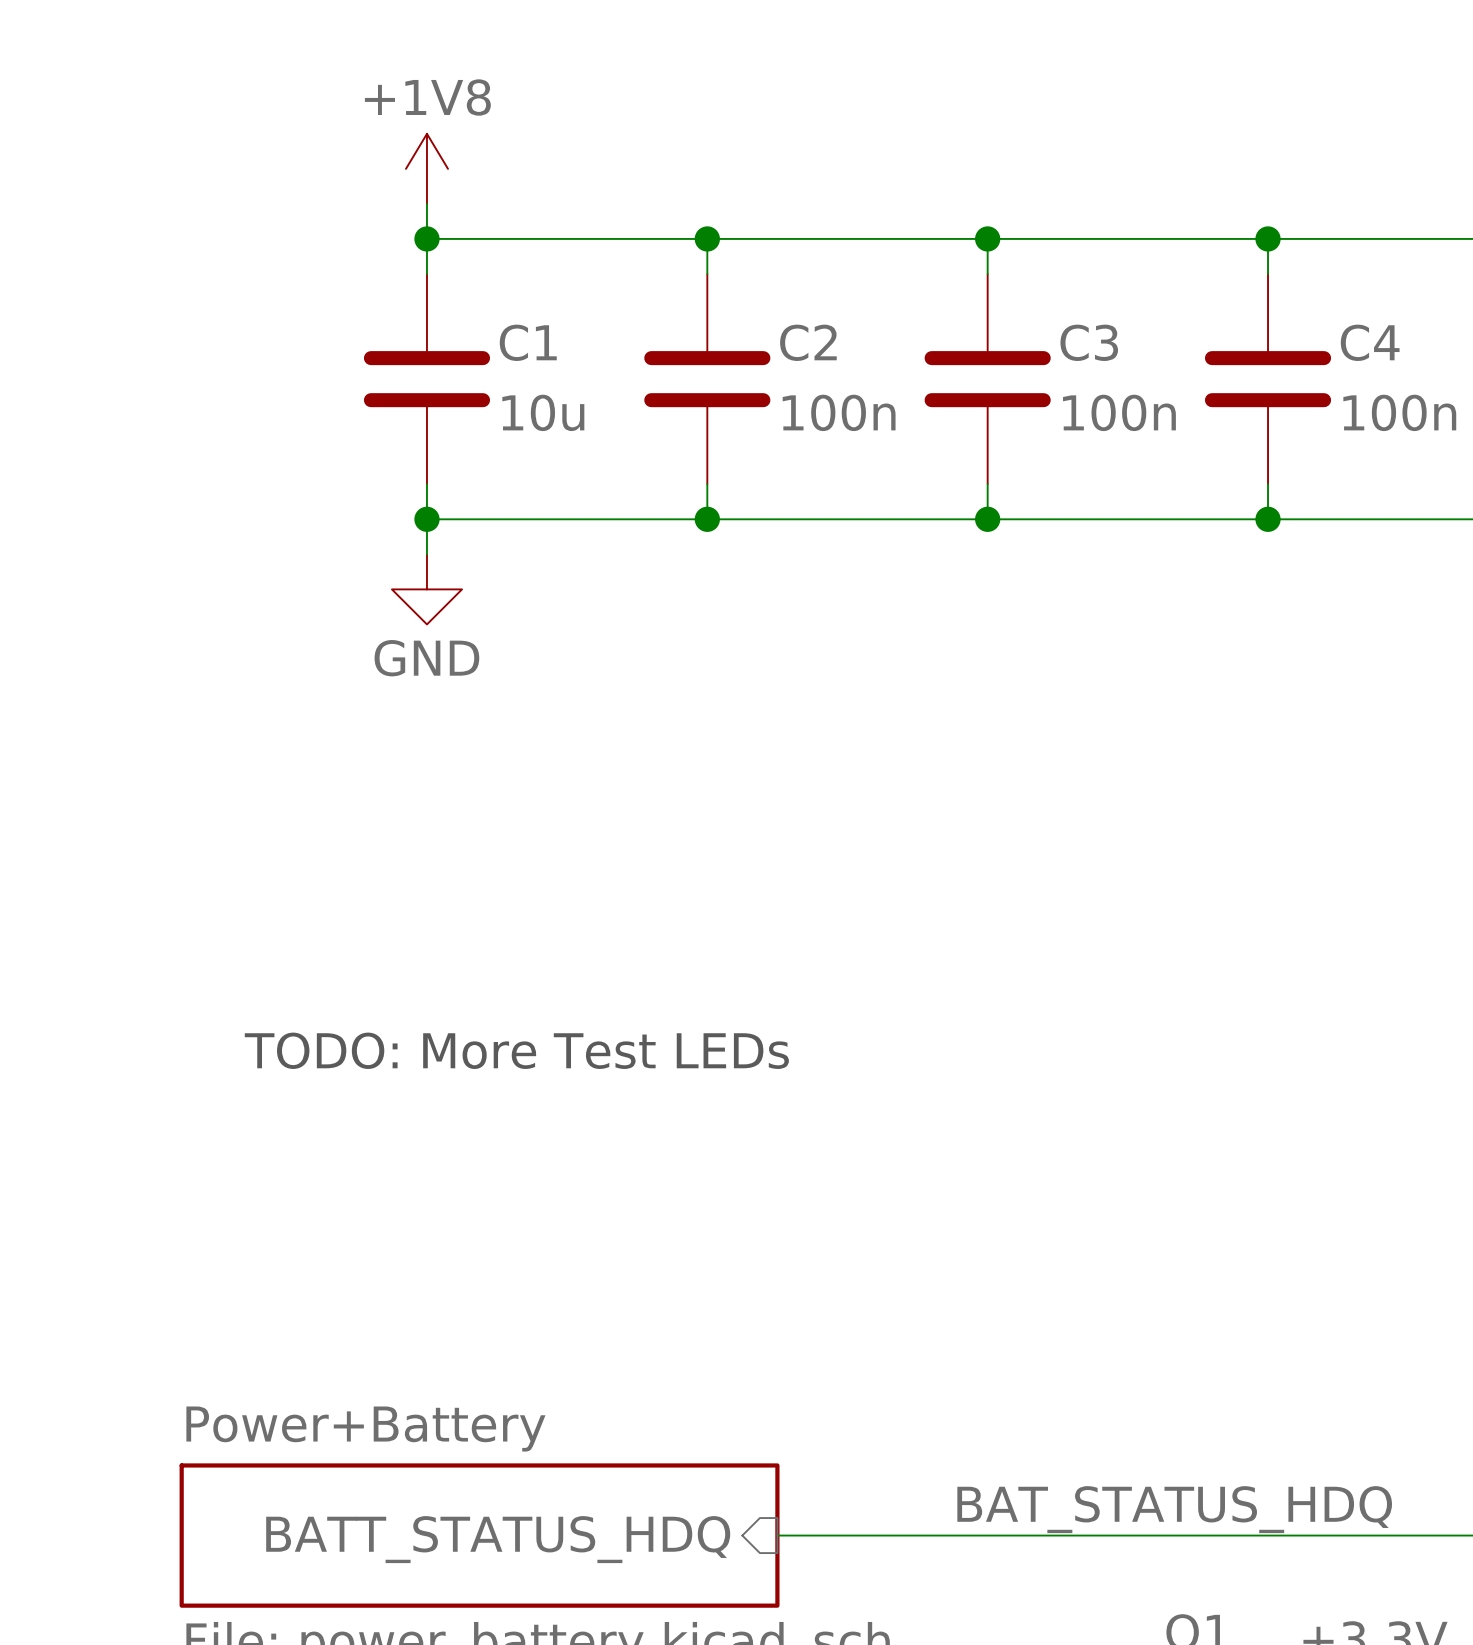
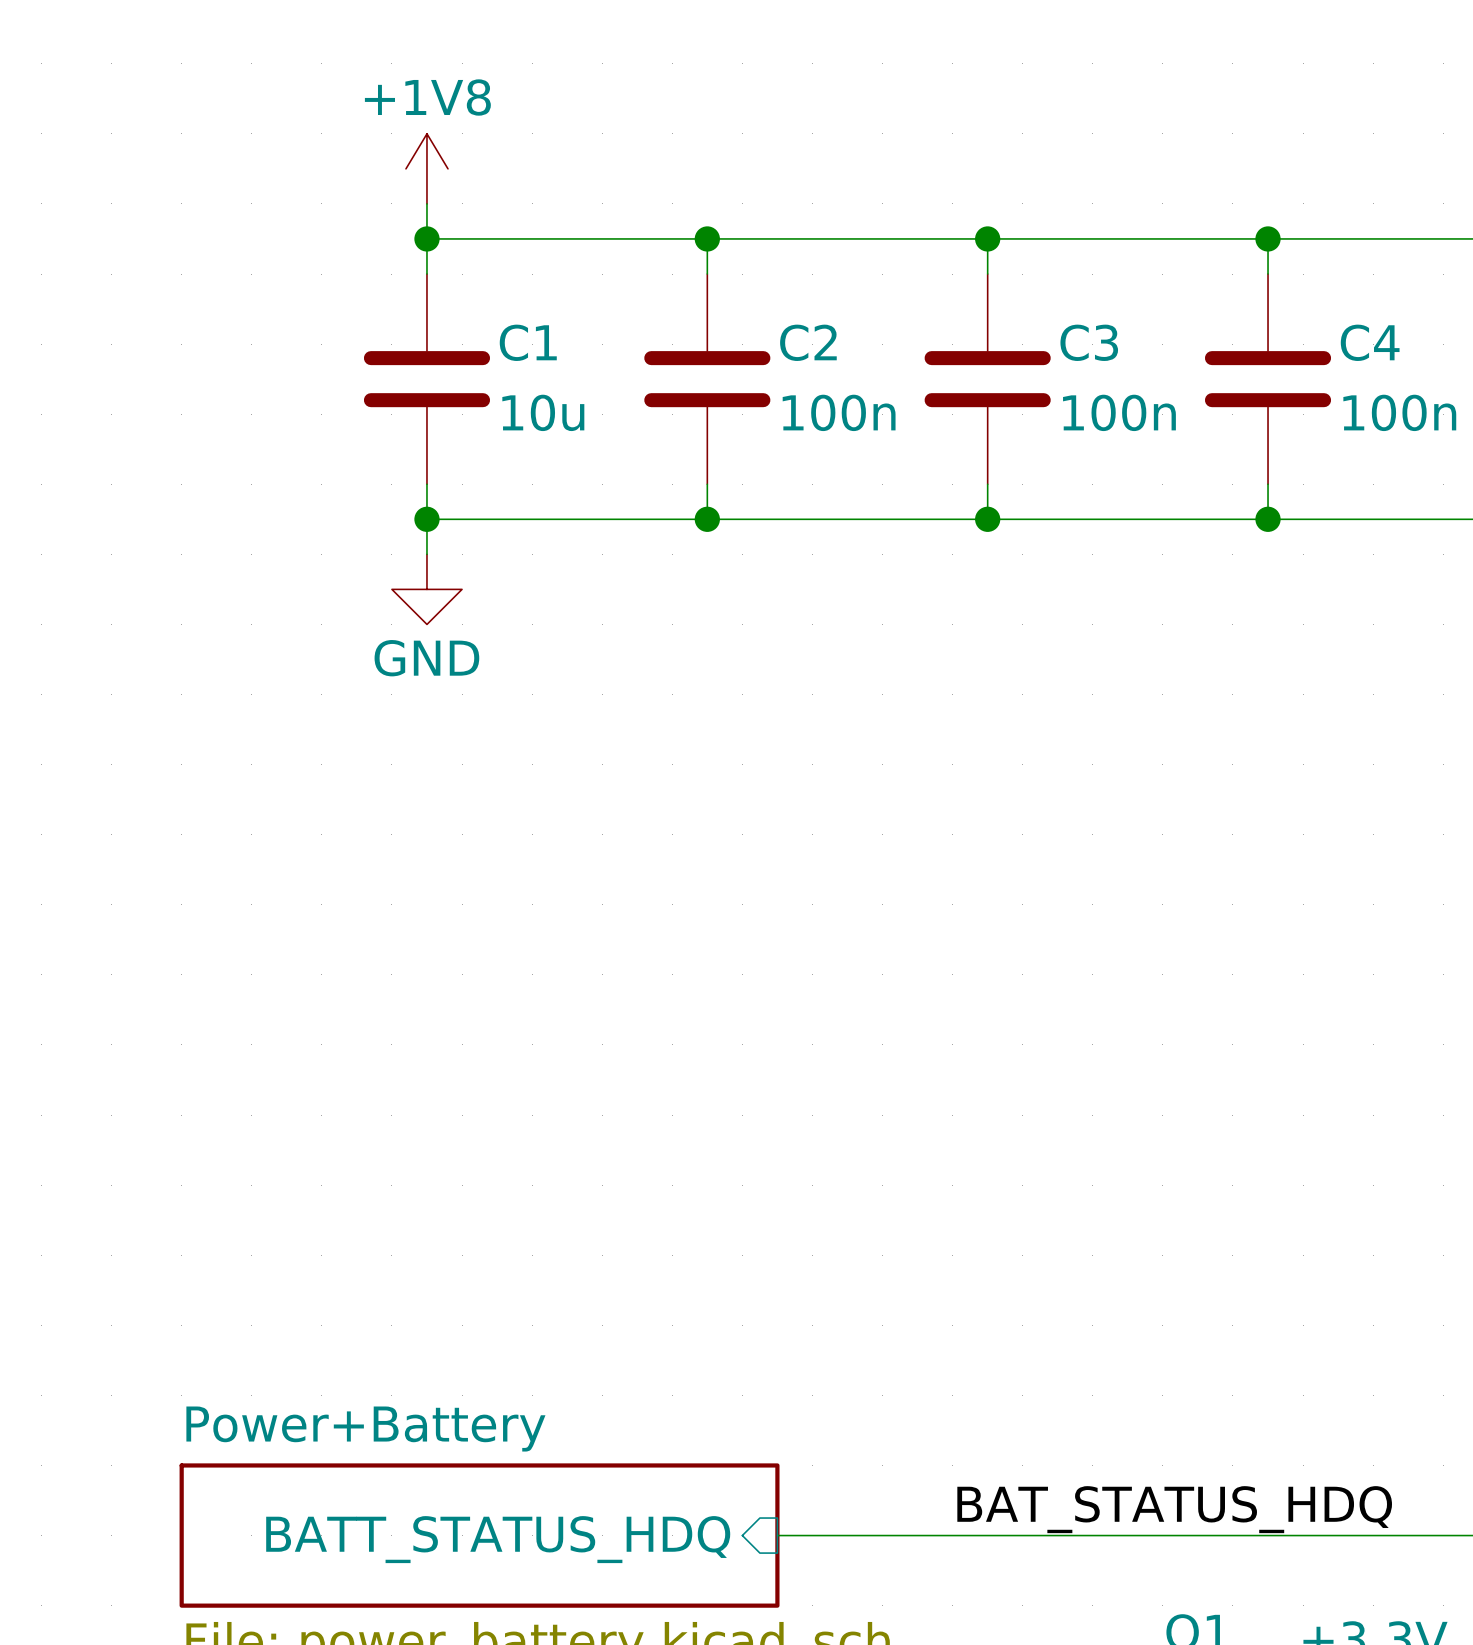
text: TODO: More Test LEDs (516, 1050) -> none

